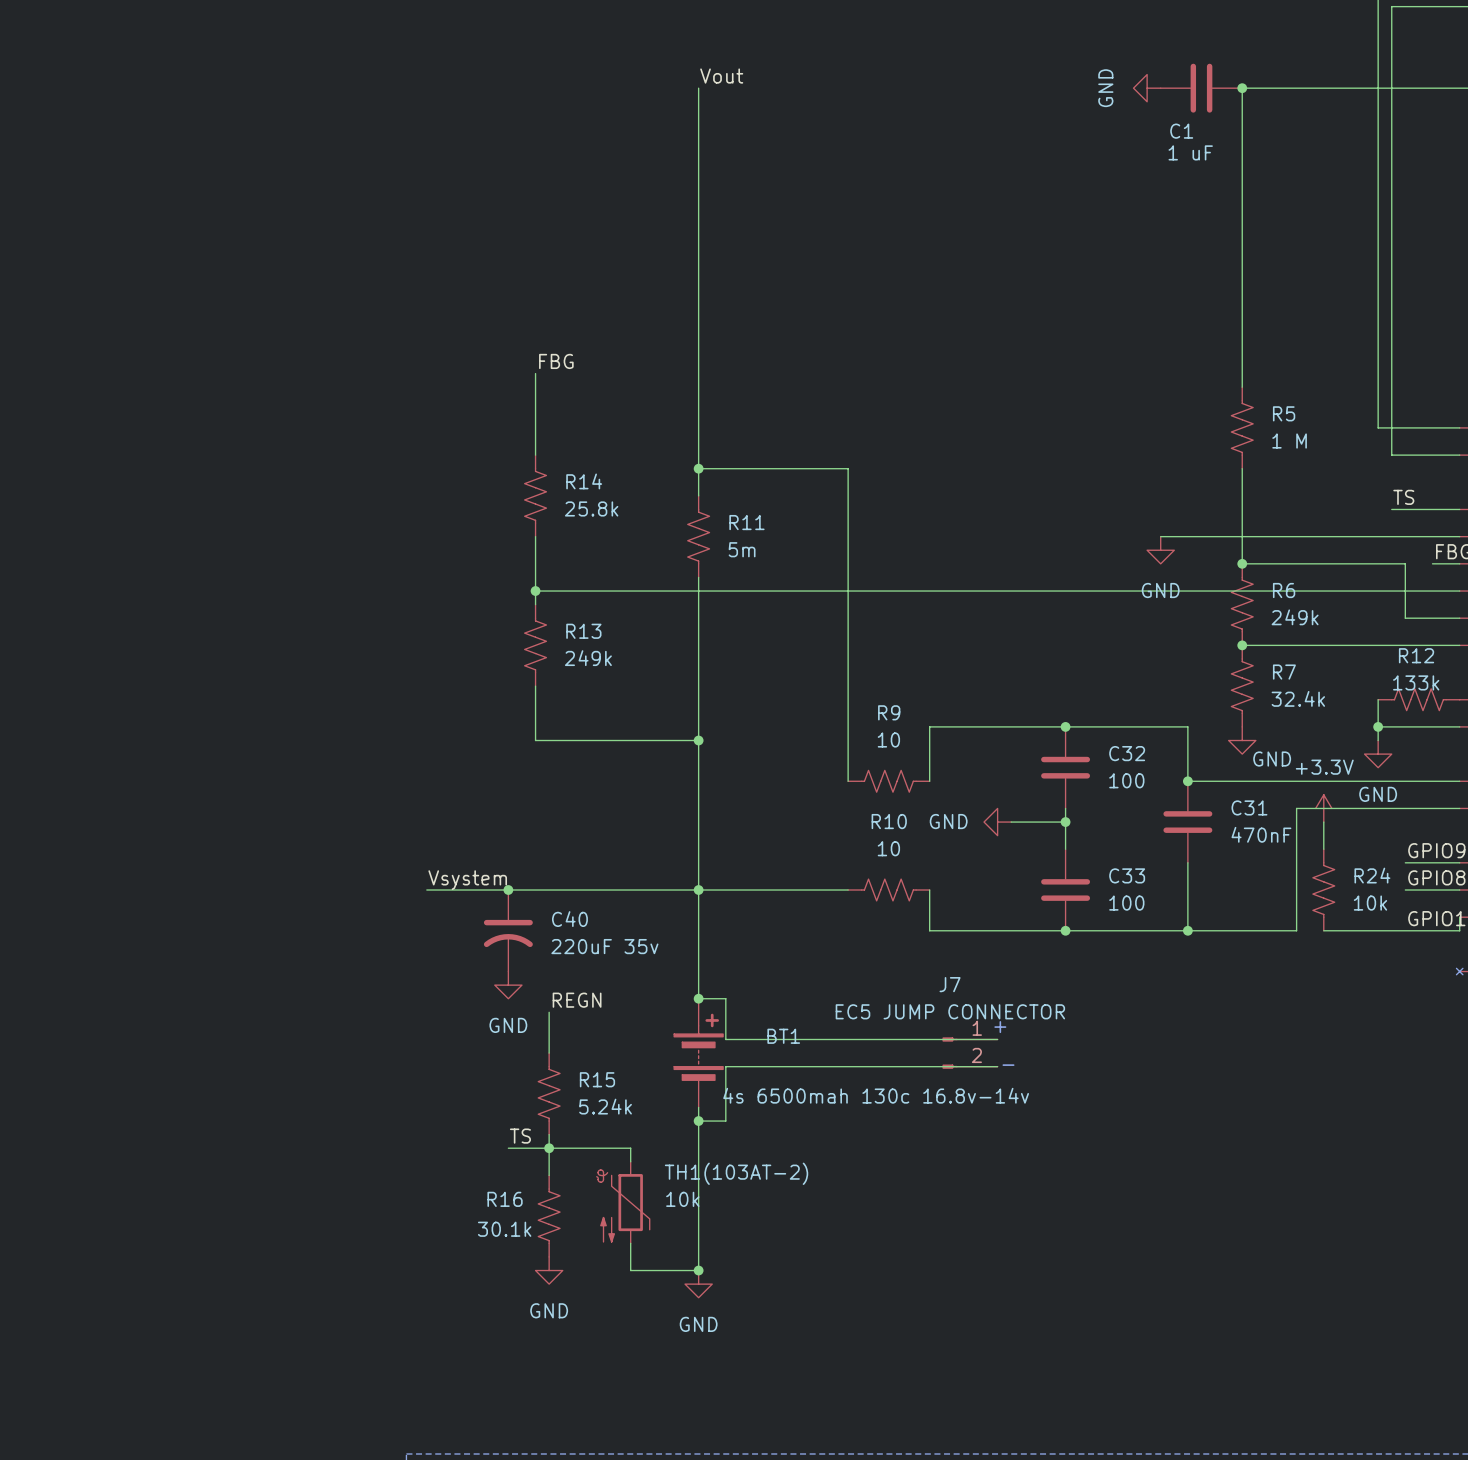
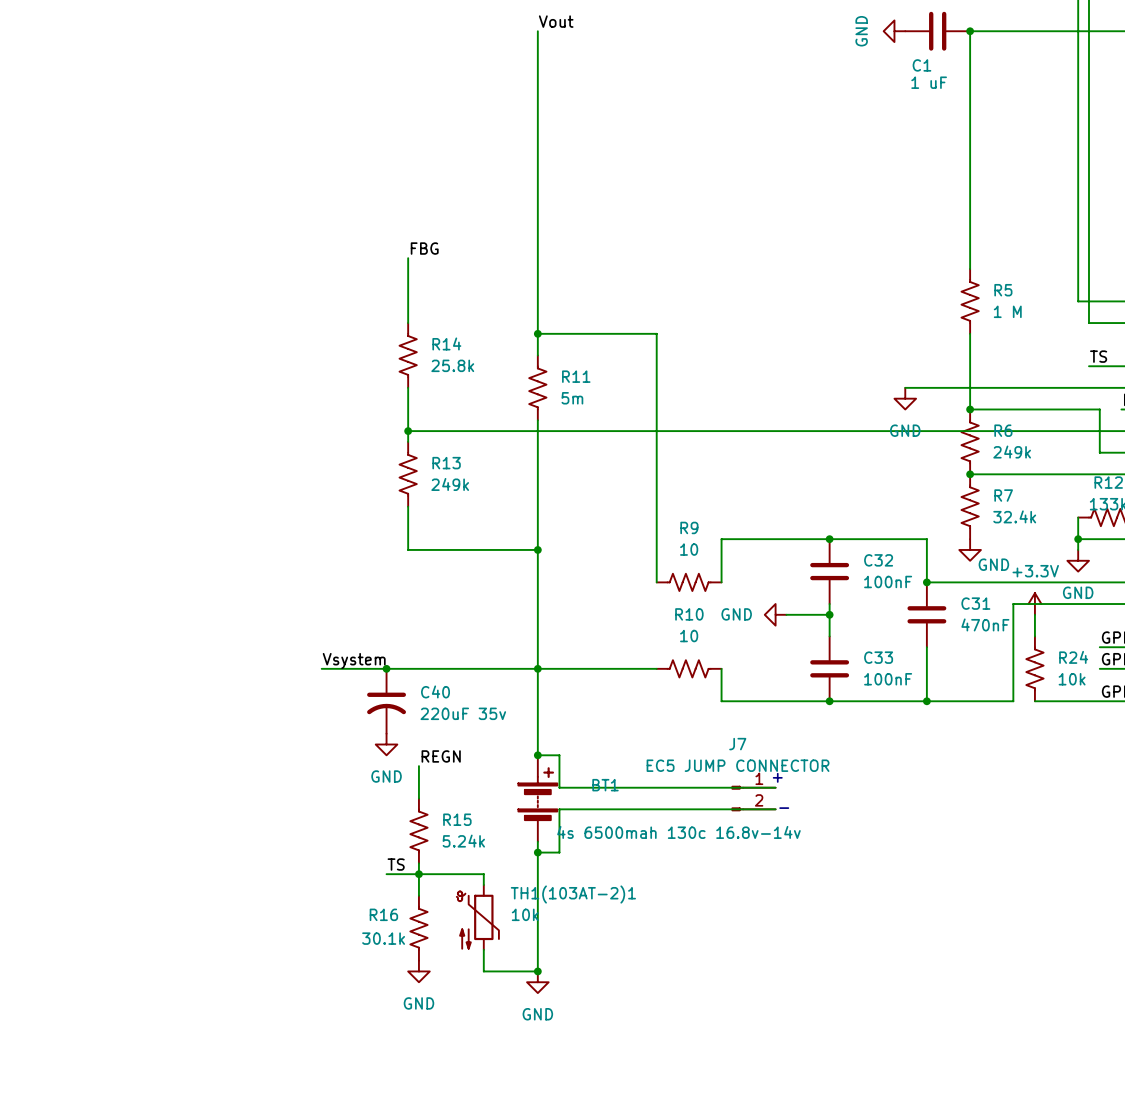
C32 value: 100 (1126, 780) -> 100nF (888, 581)
C33 value: 100 (1126, 903) -> 100nF (888, 679)
TH1(103AT-2) name: TH1(103AT-2) (736, 1173) -> TH1(103AT-2)1 (573, 894)

